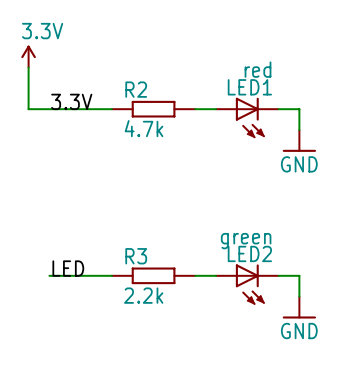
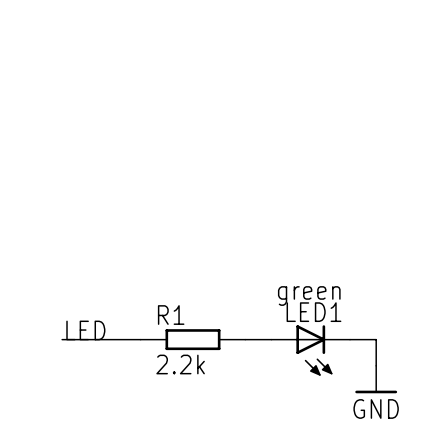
power symbol: 3.3V (28, 56) -> none
wire: (28, 67) (28, 109) (111, 109) -> none
label: 3.3V (71, 101) -> none
R2: 4.7k (153, 109) -> none
wire: (195, 109) (216, 109) -> none
wire: (278, 109) (299, 109) (299, 130) -> none
LED1: red (247, 117) -> none
power symbol: GND (299, 140) -> none
LED2 name: LED2 (249, 253) -> LED1 (313, 312)
R3 name: R3 (136, 256) -> R1 (171, 315)

